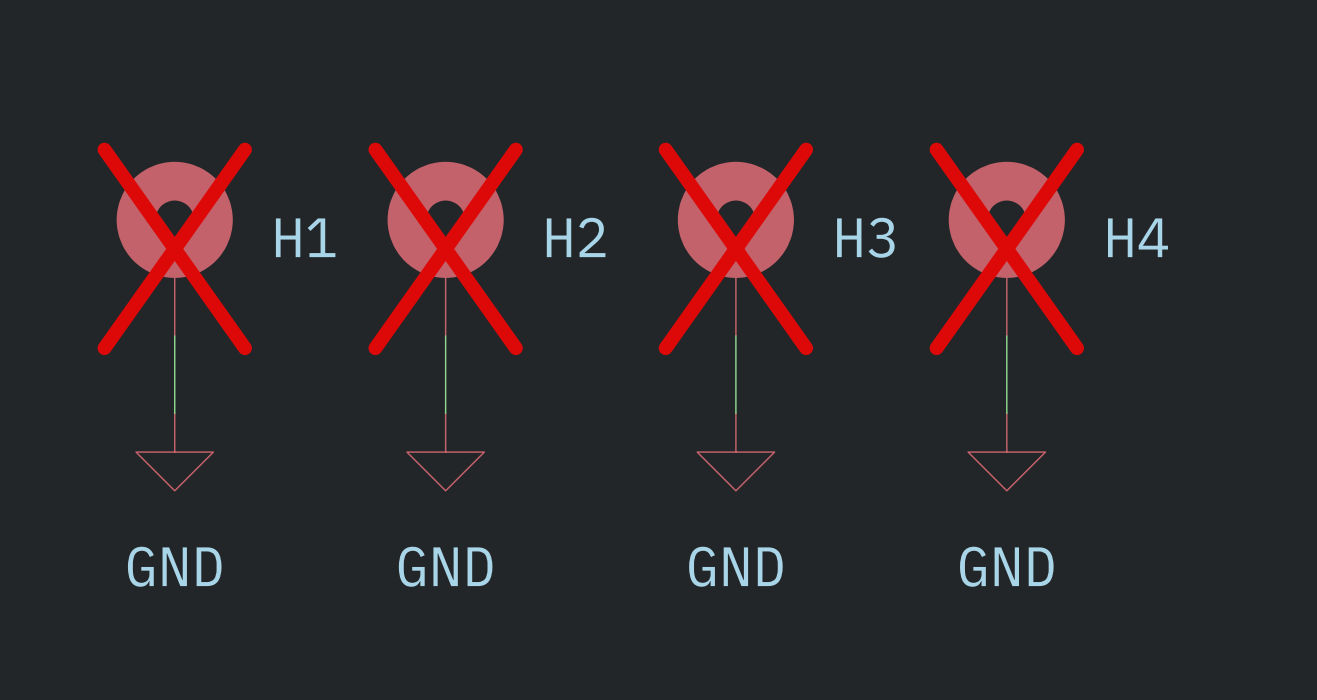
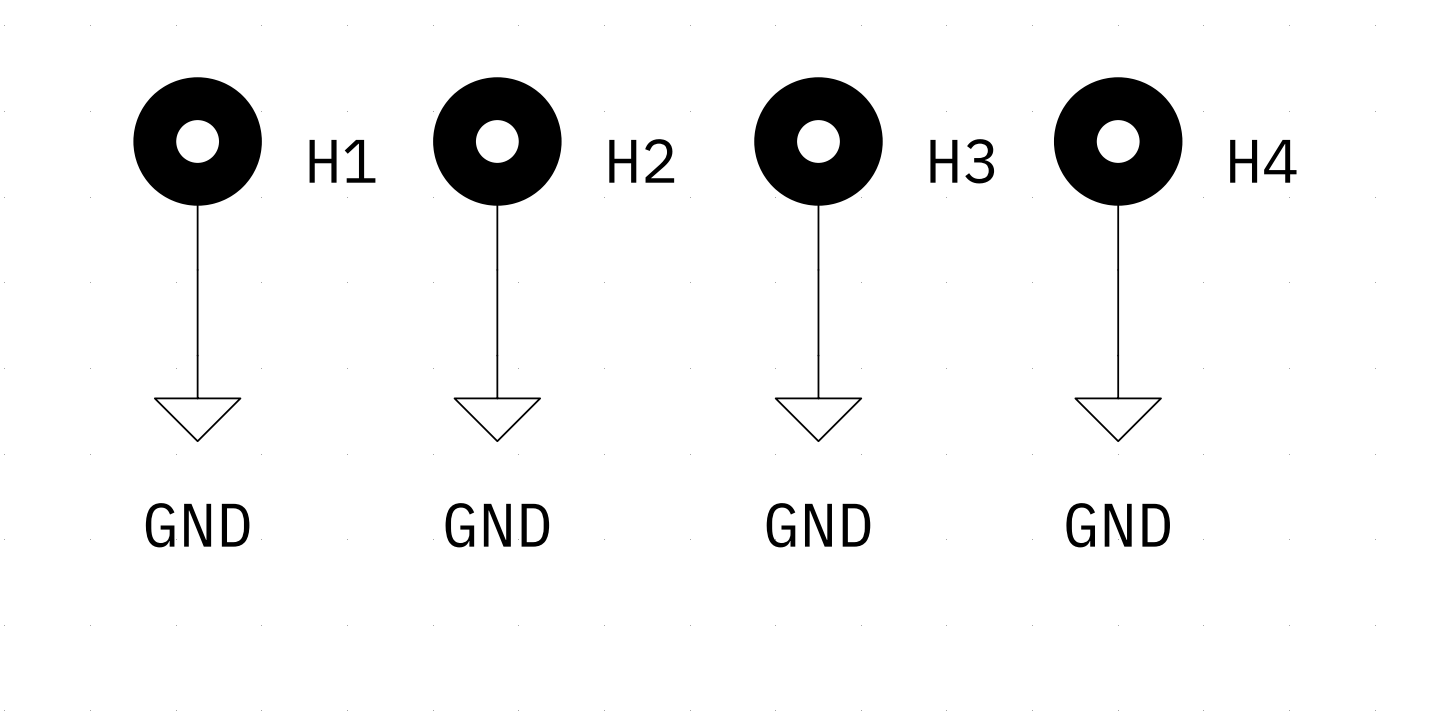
H1 do-not-place cross: (174, 248) -> none
H2 do-not-place cross: (445, 248) -> none
H3 do-not-place cross: (735, 248) -> none
H4 do-not-place cross: (1006, 248) -> none

